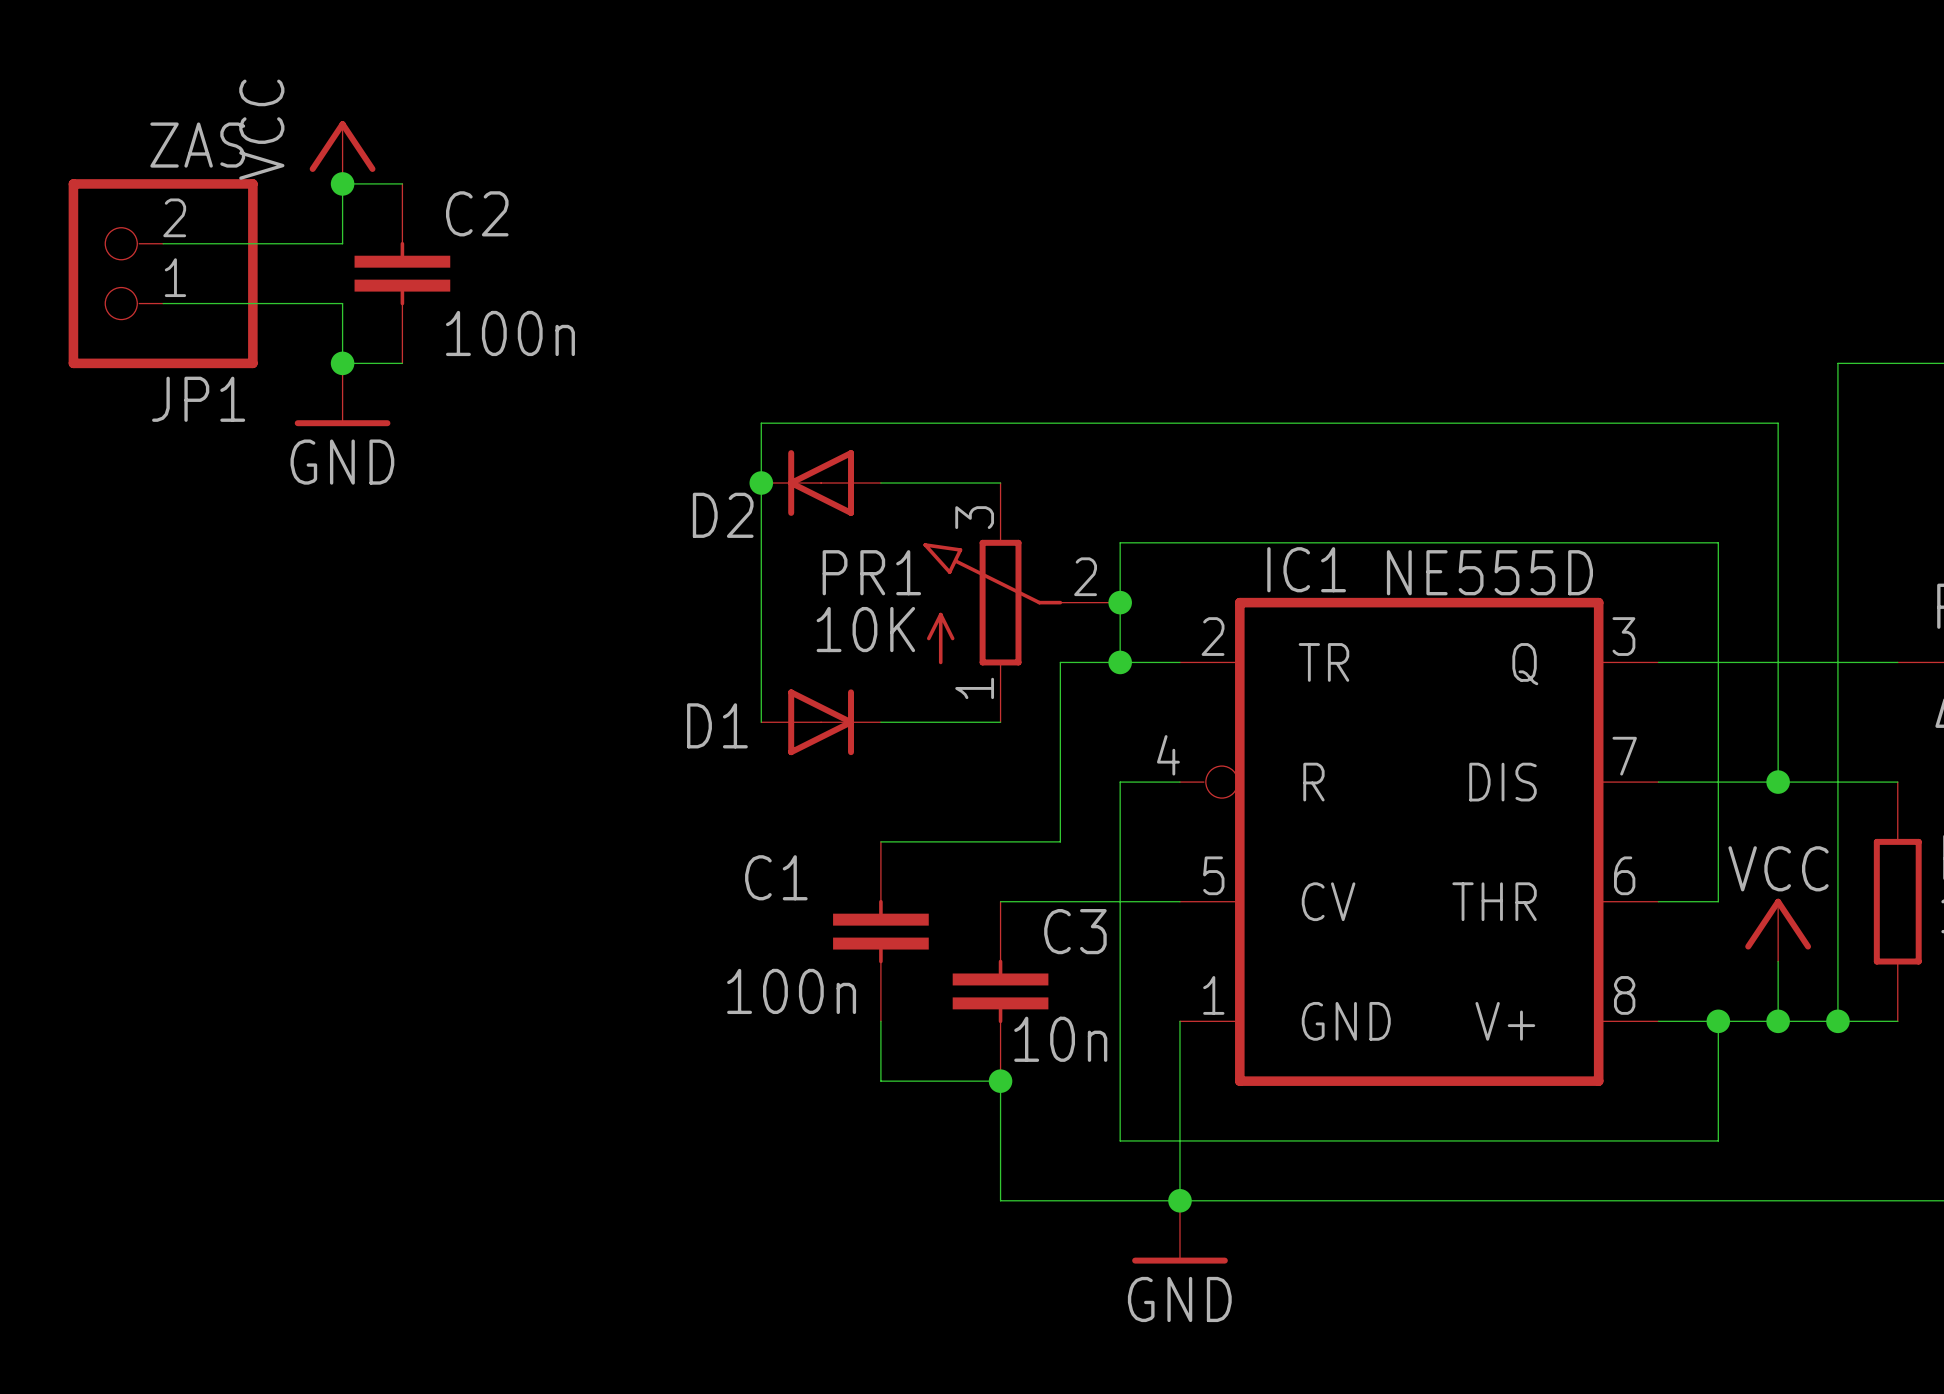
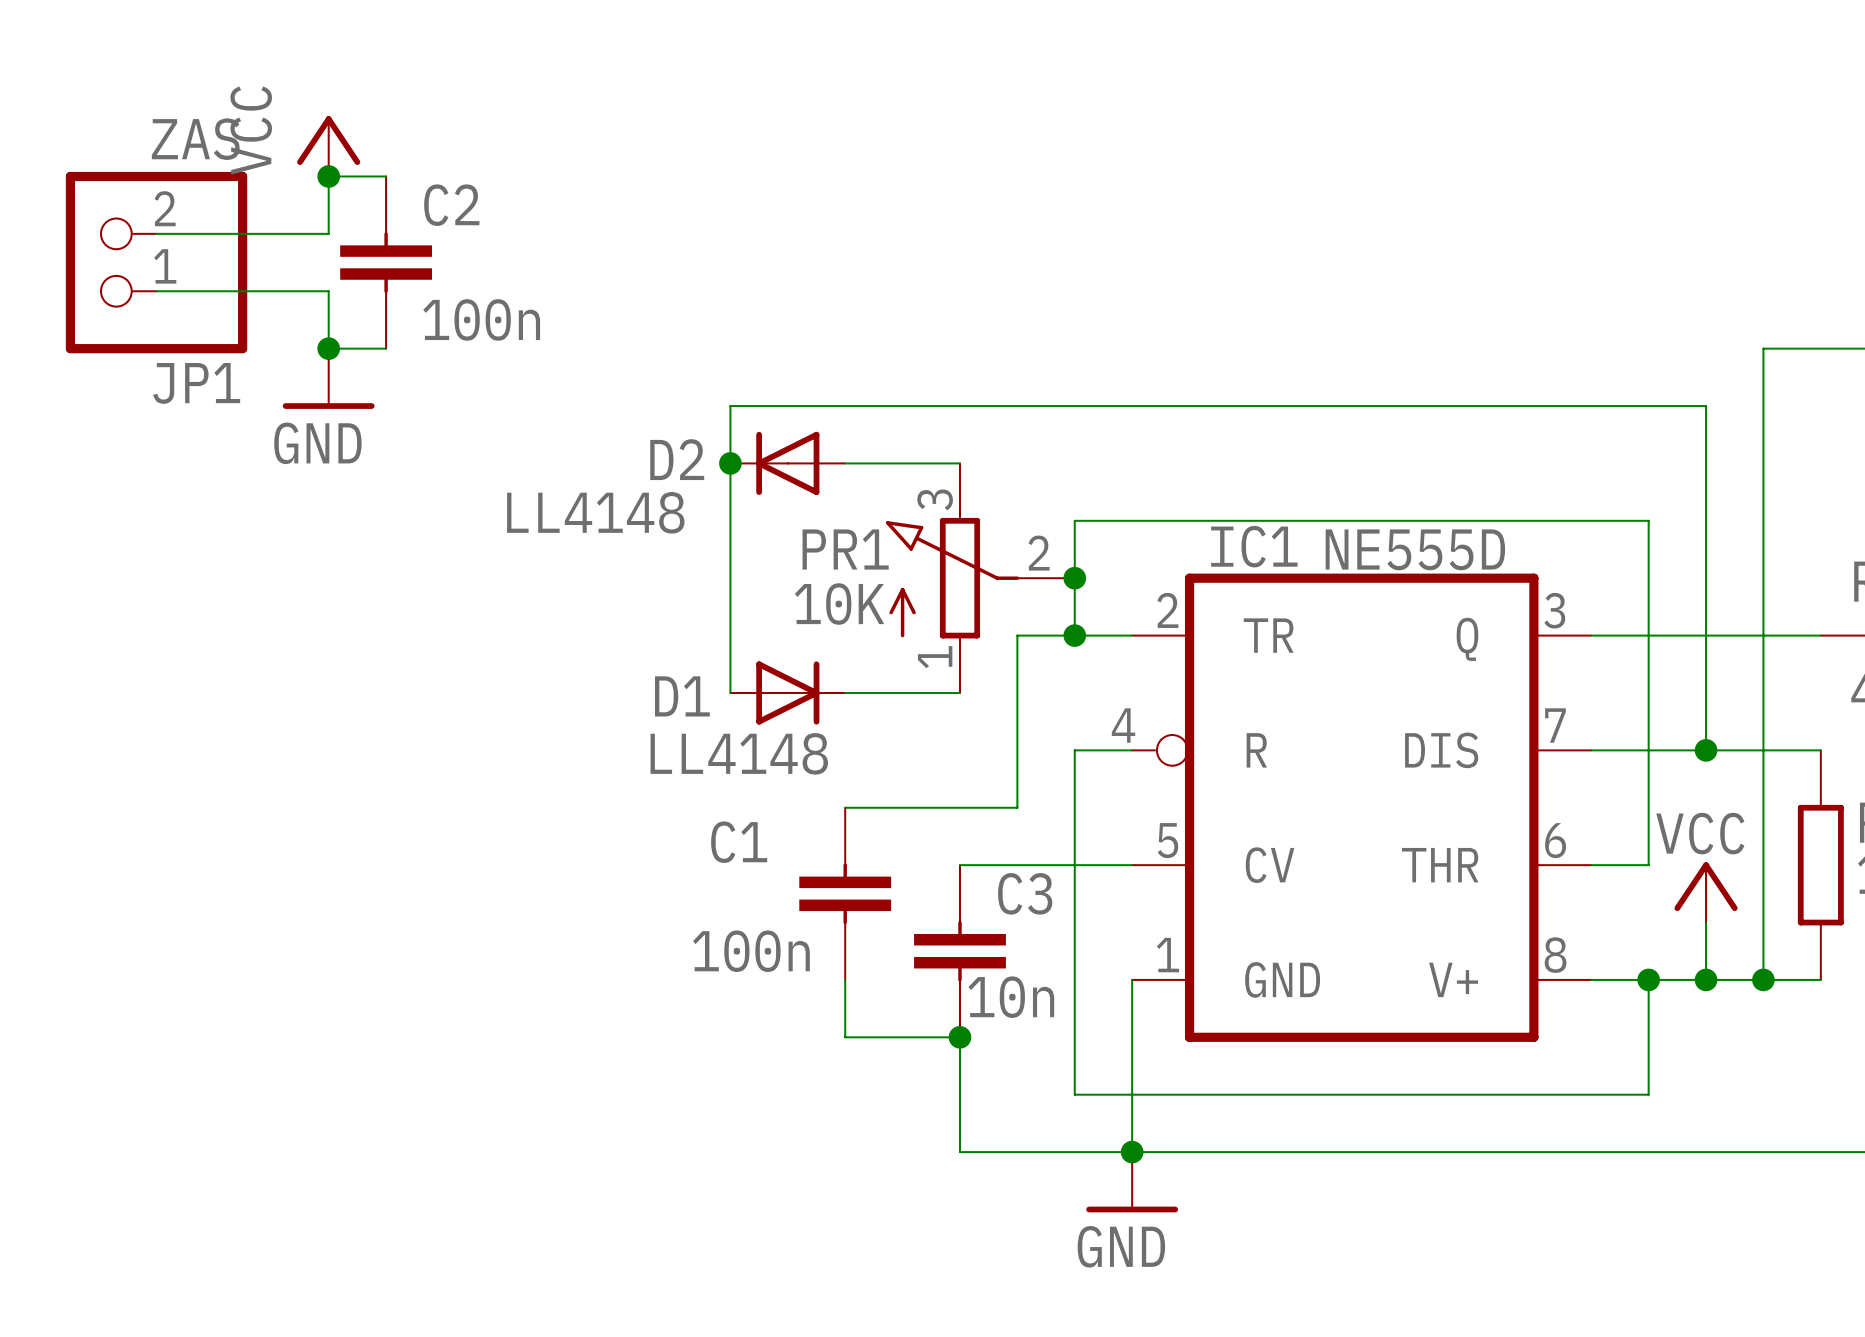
D2 name position: D2 (723, 515) -> D2 (677, 459)
D2 value: none -> LL4148 (595, 512)
D1 value: none -> LL4148 (739, 753)

